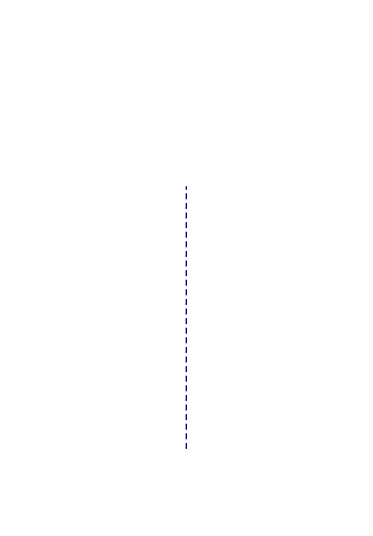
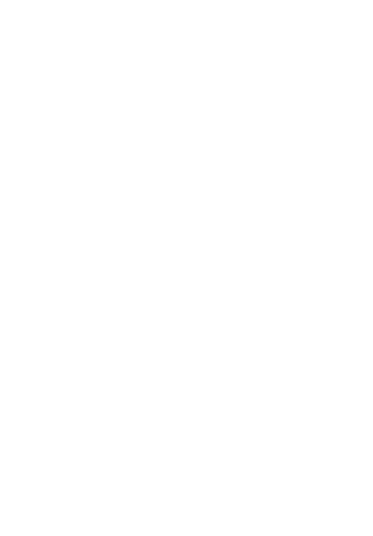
line: (186, 186) (186, 448) -> none

